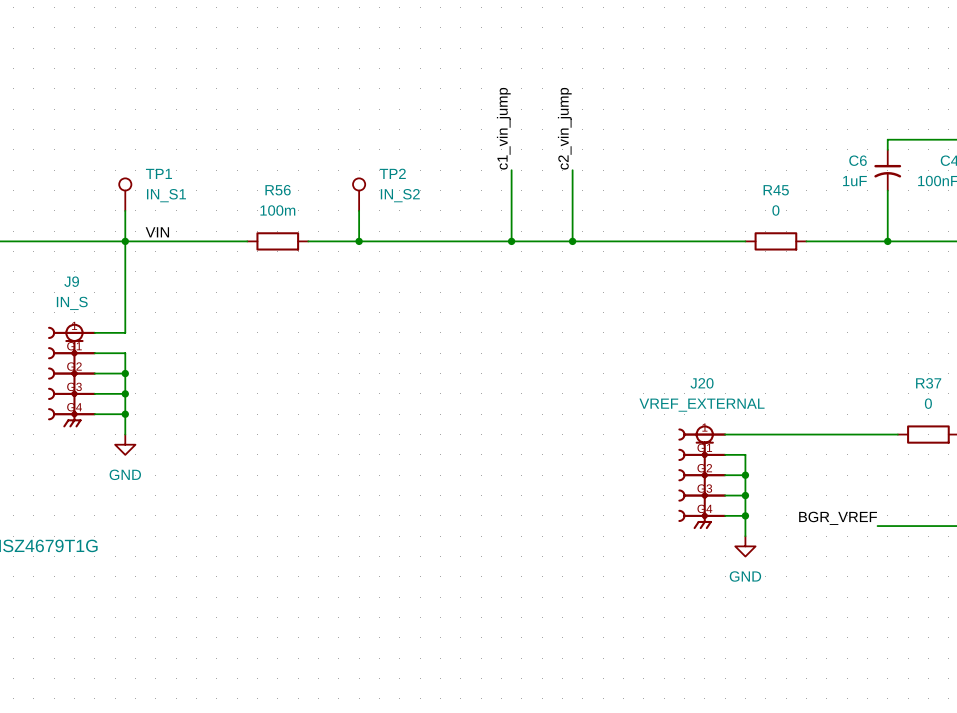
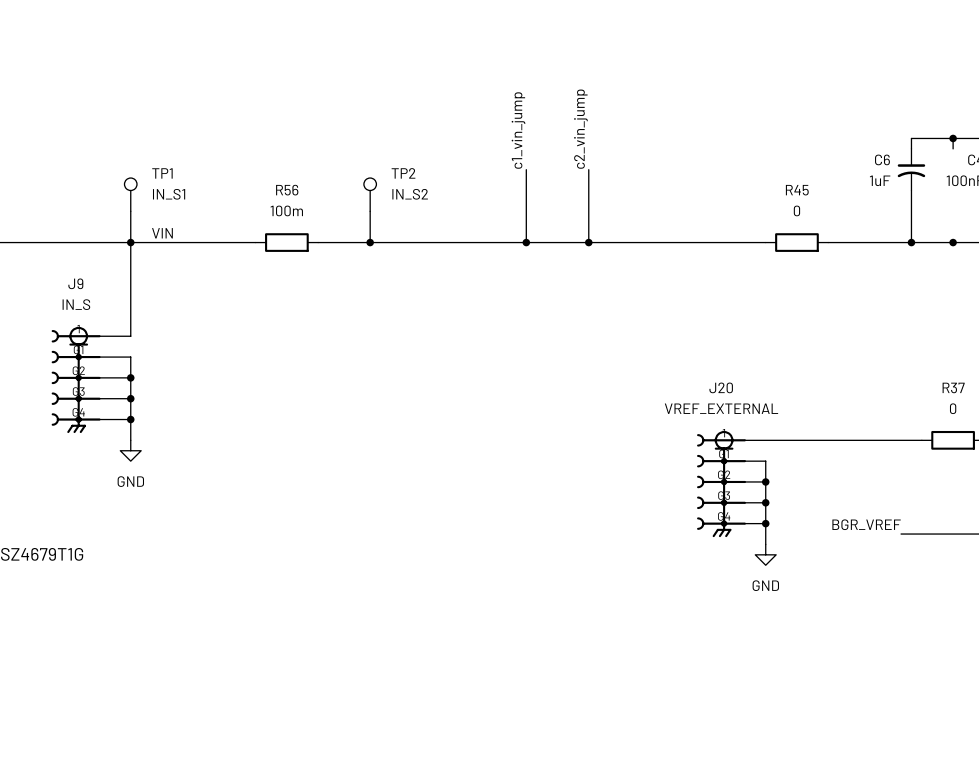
wire: none -> (953, 138) (953, 148)
junction: none -> (953, 138)
junction: none -> (953, 242)

